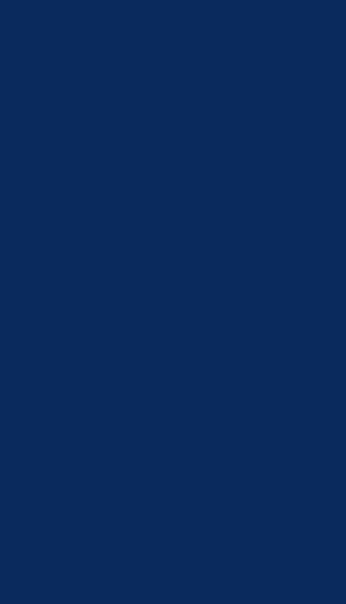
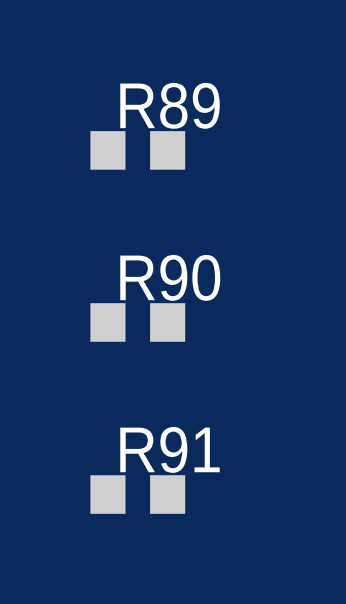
R89: none -> (137, 150)
R90: none -> (137, 322)
R91: none -> (137, 494)

